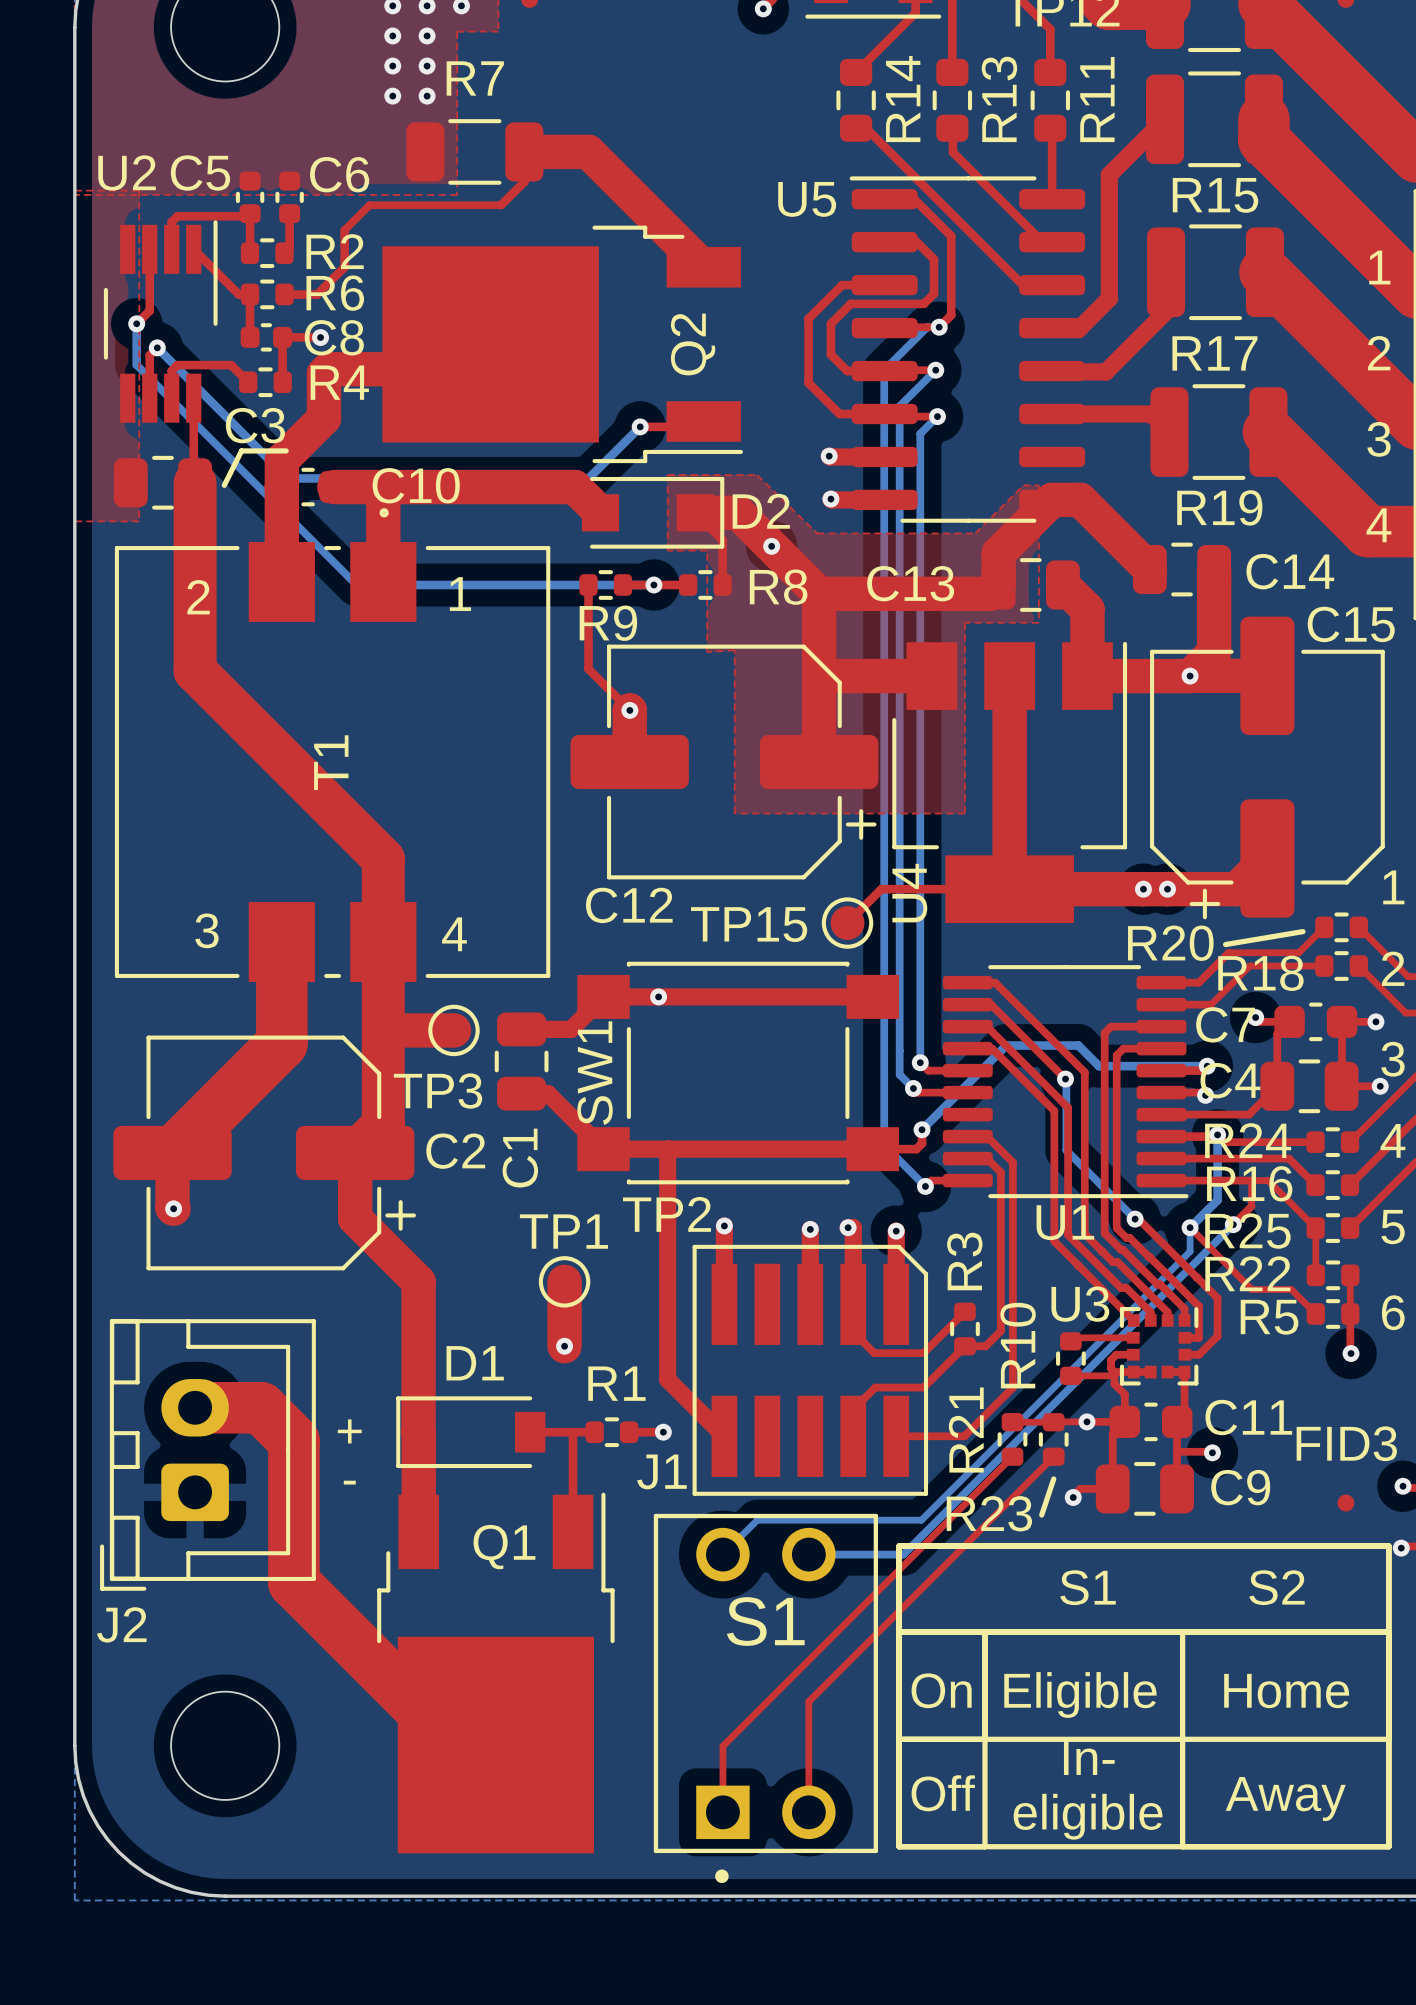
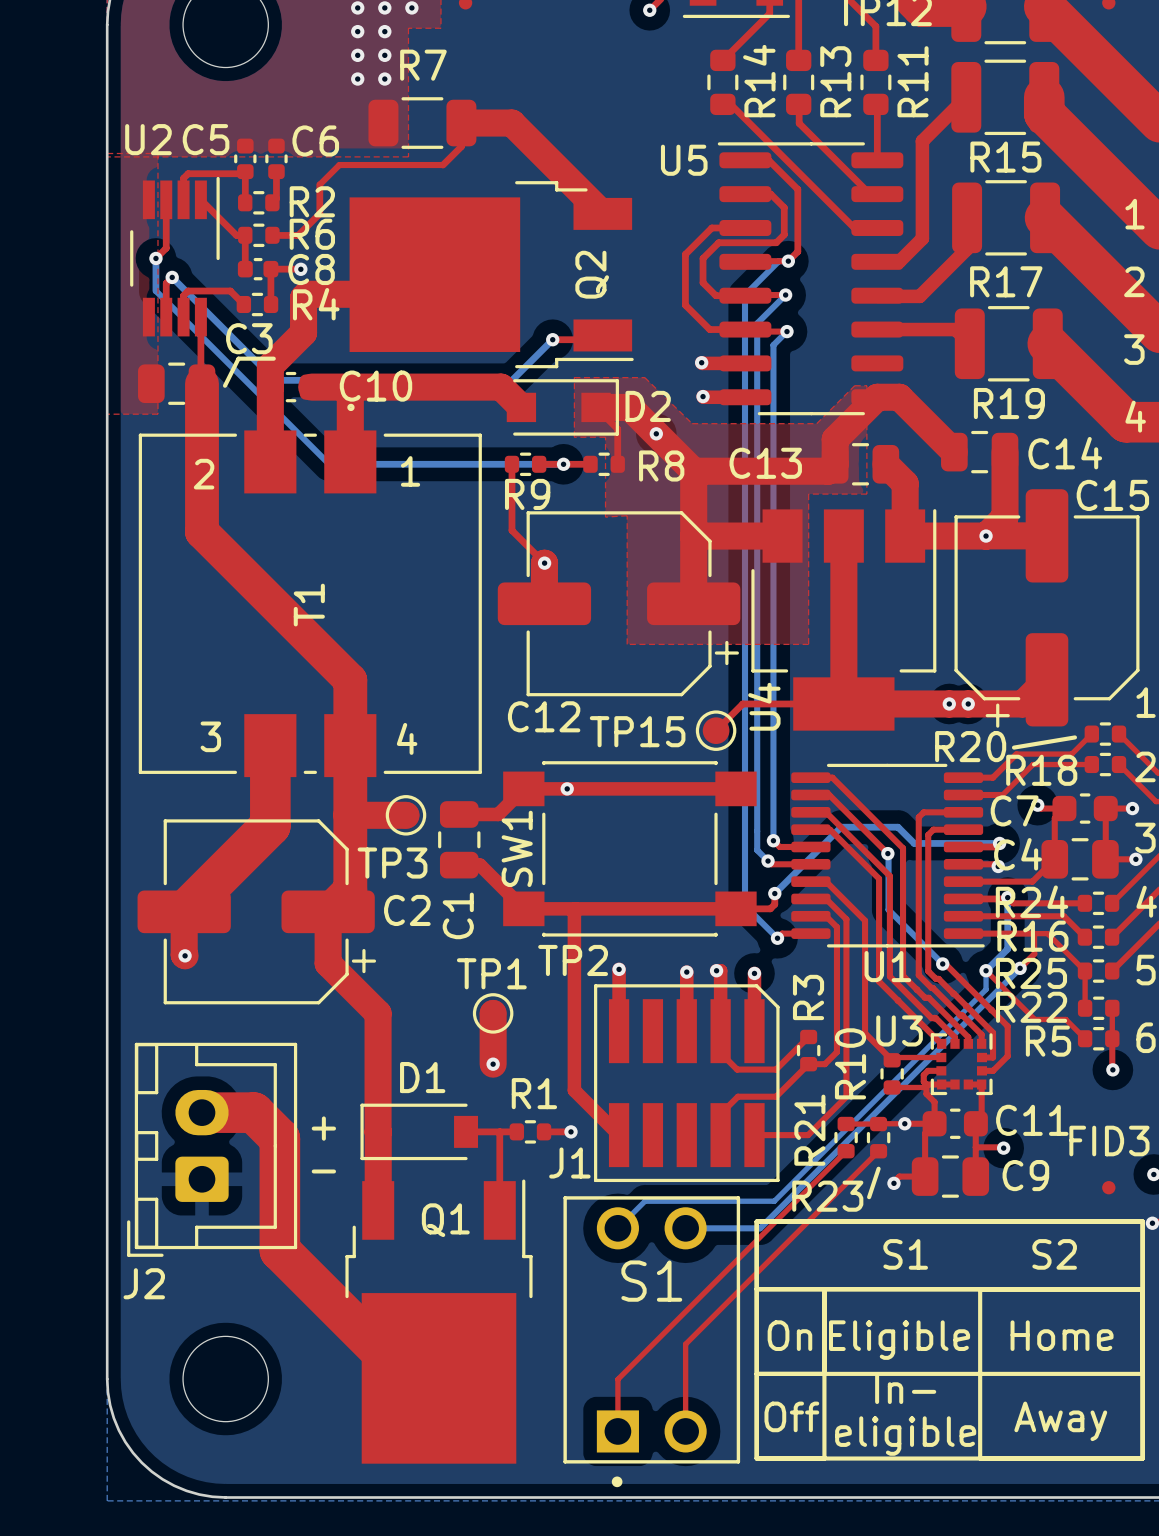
top track: none -> (810, 881) (826, 881) (865, 920) (865, 1033) (892, 1060)

